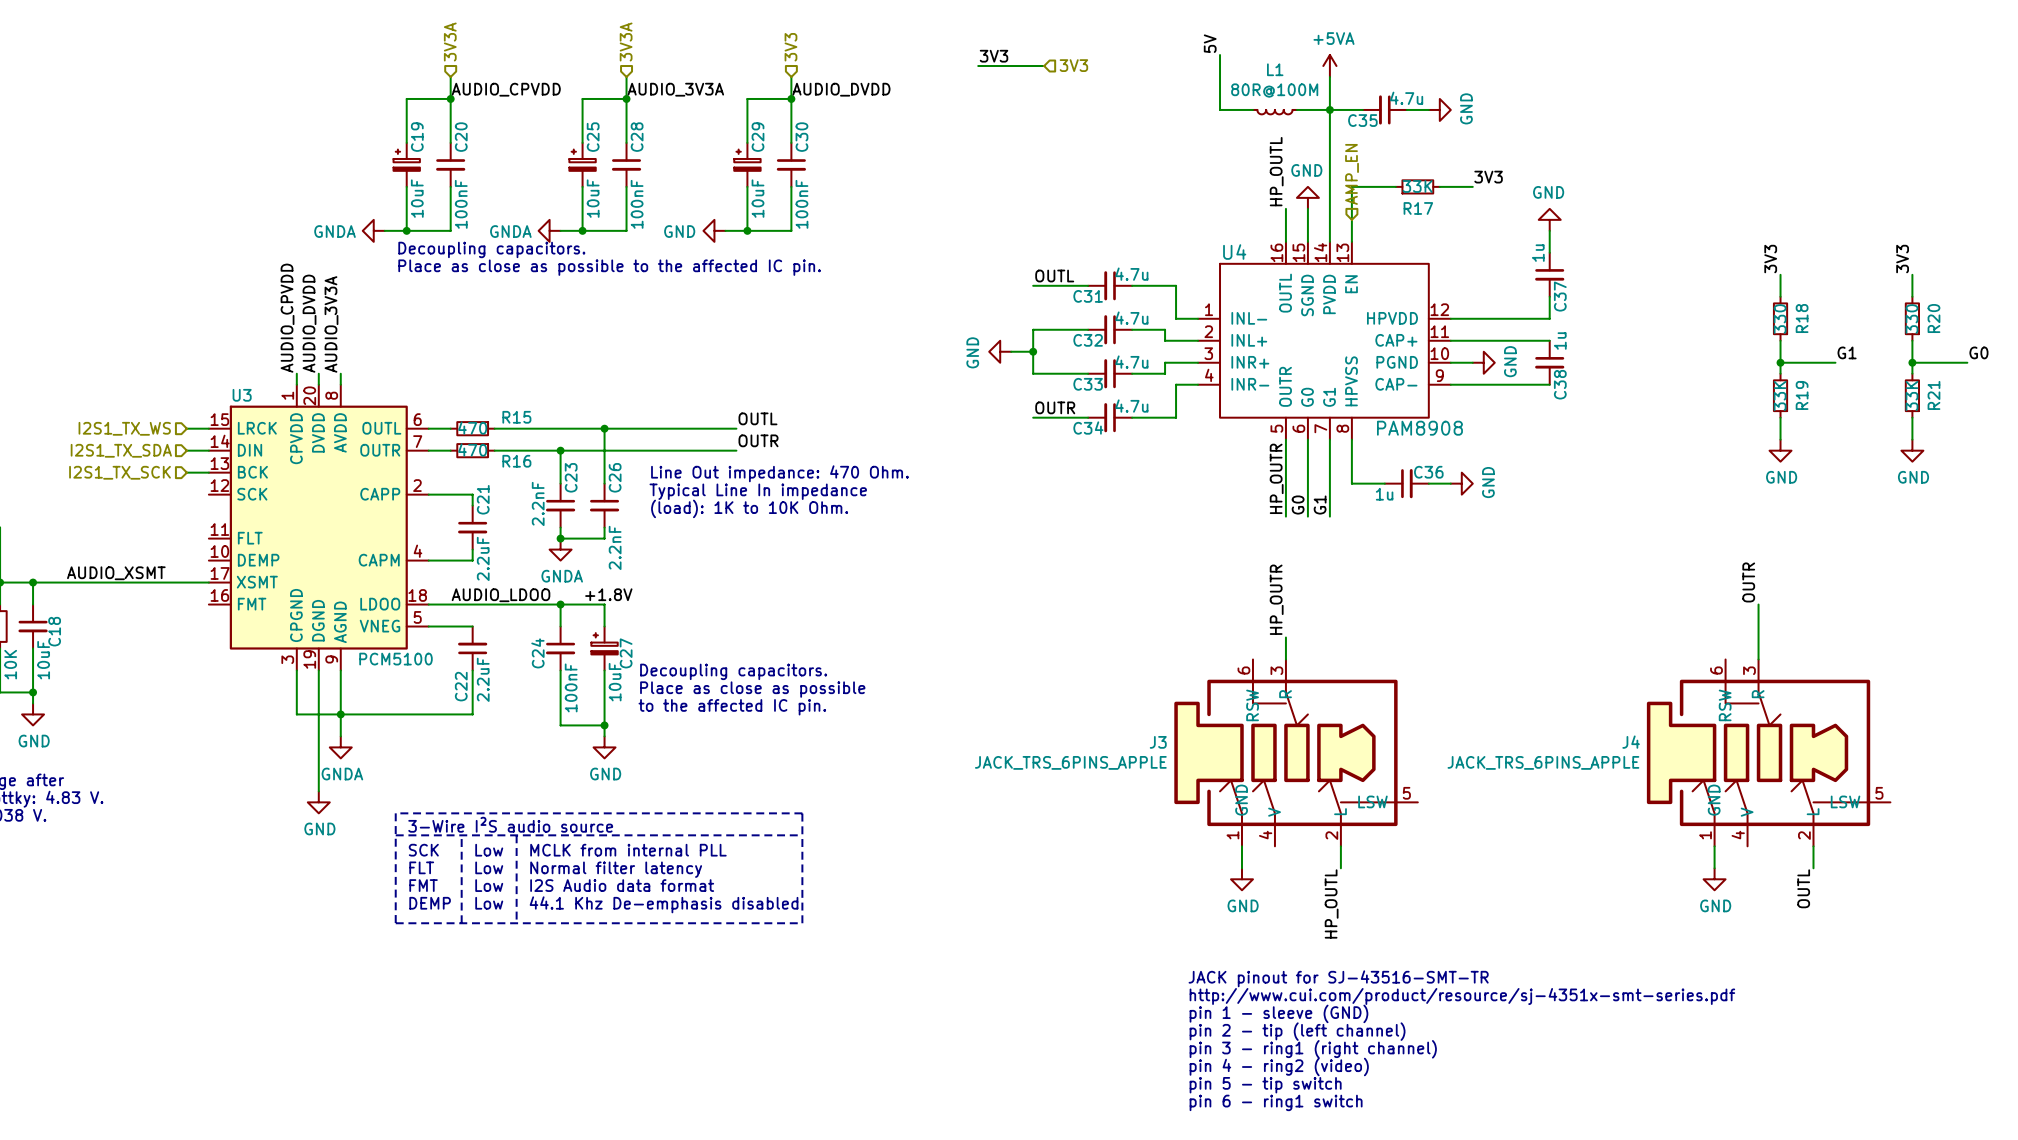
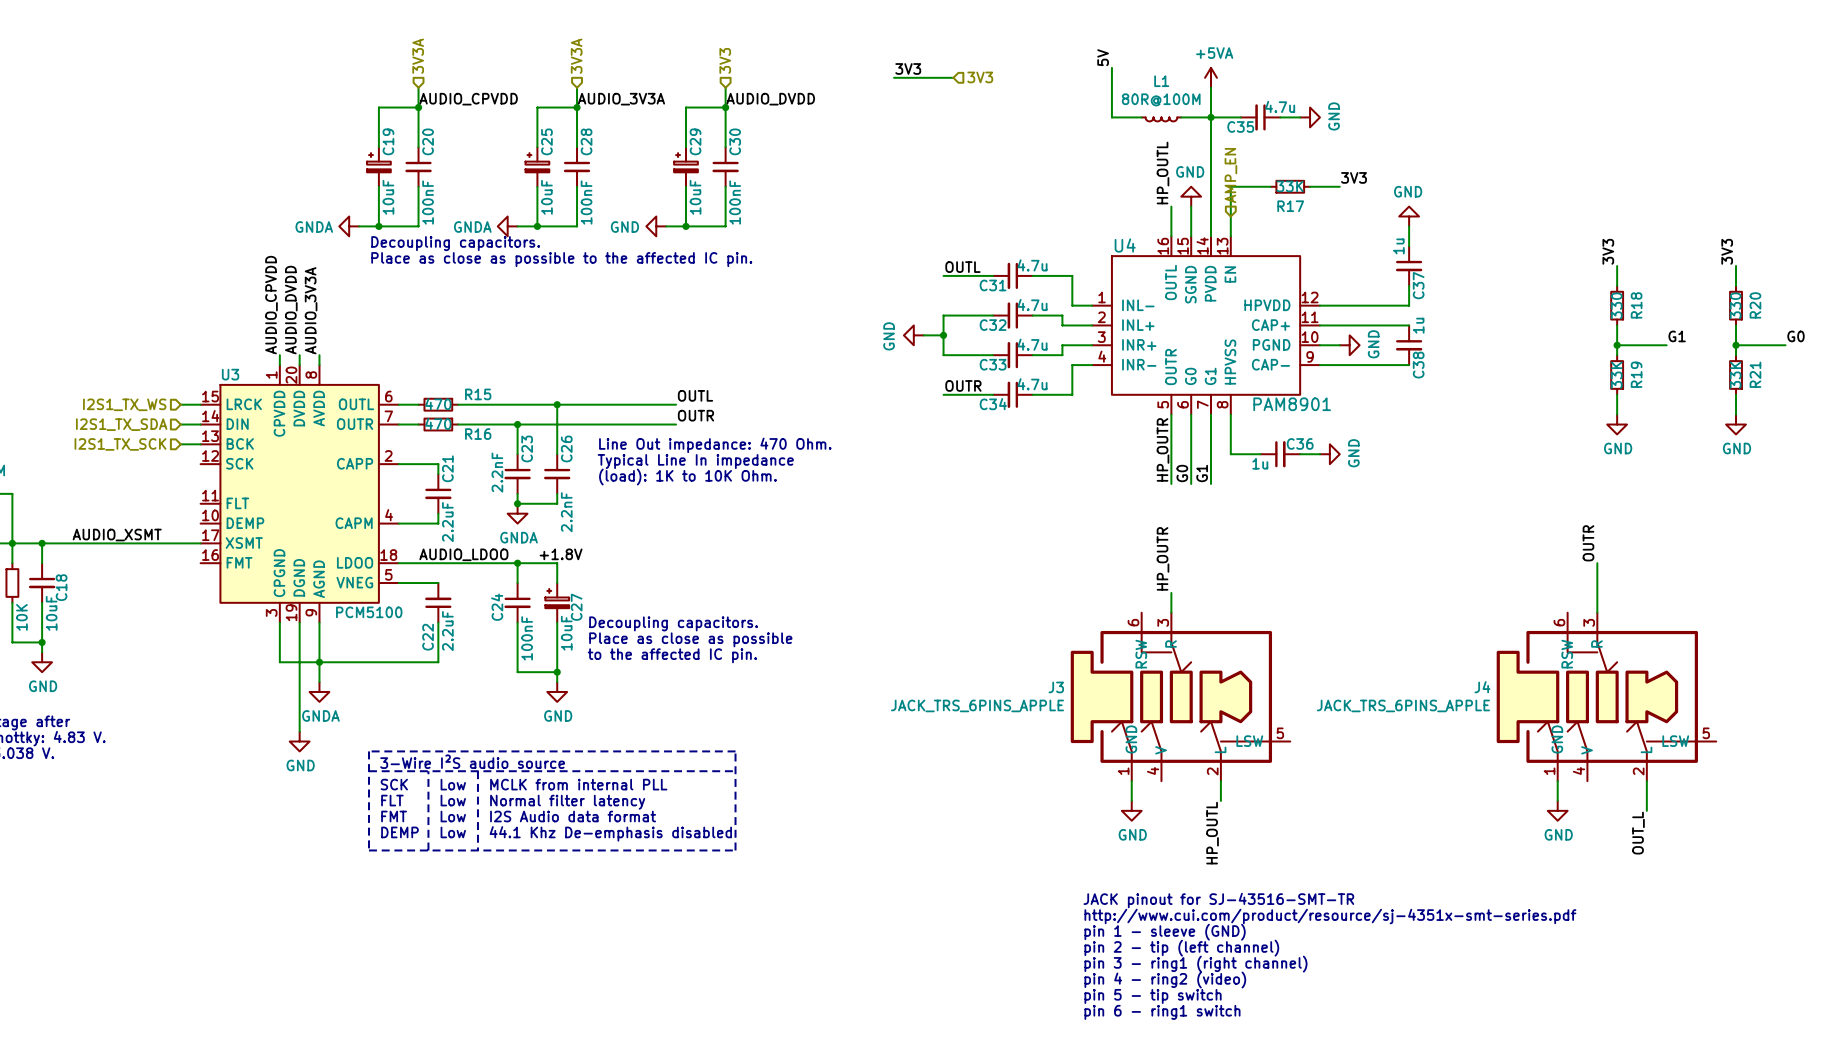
U4 value: PAM8908 (1419, 428) -> PAM8901 (1292, 404)
wire: none -> (1646, 800) (1646, 810)
label: OUTL (1803, 888) -> OUT_L (1638, 833)

